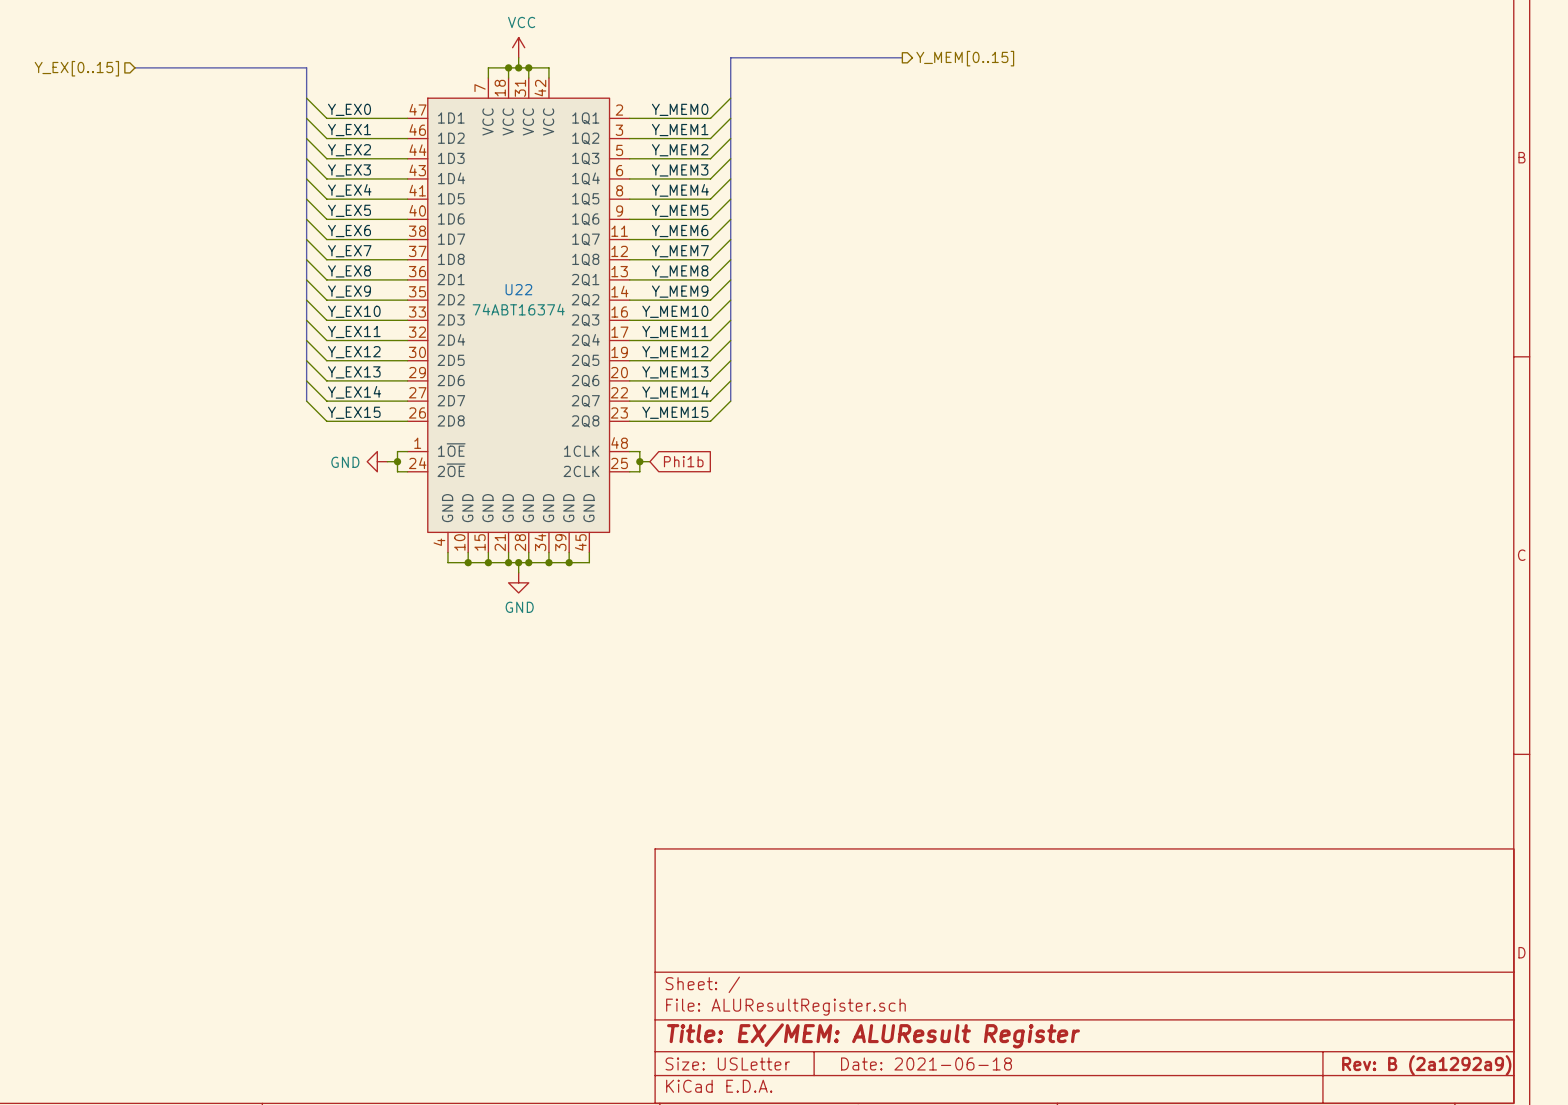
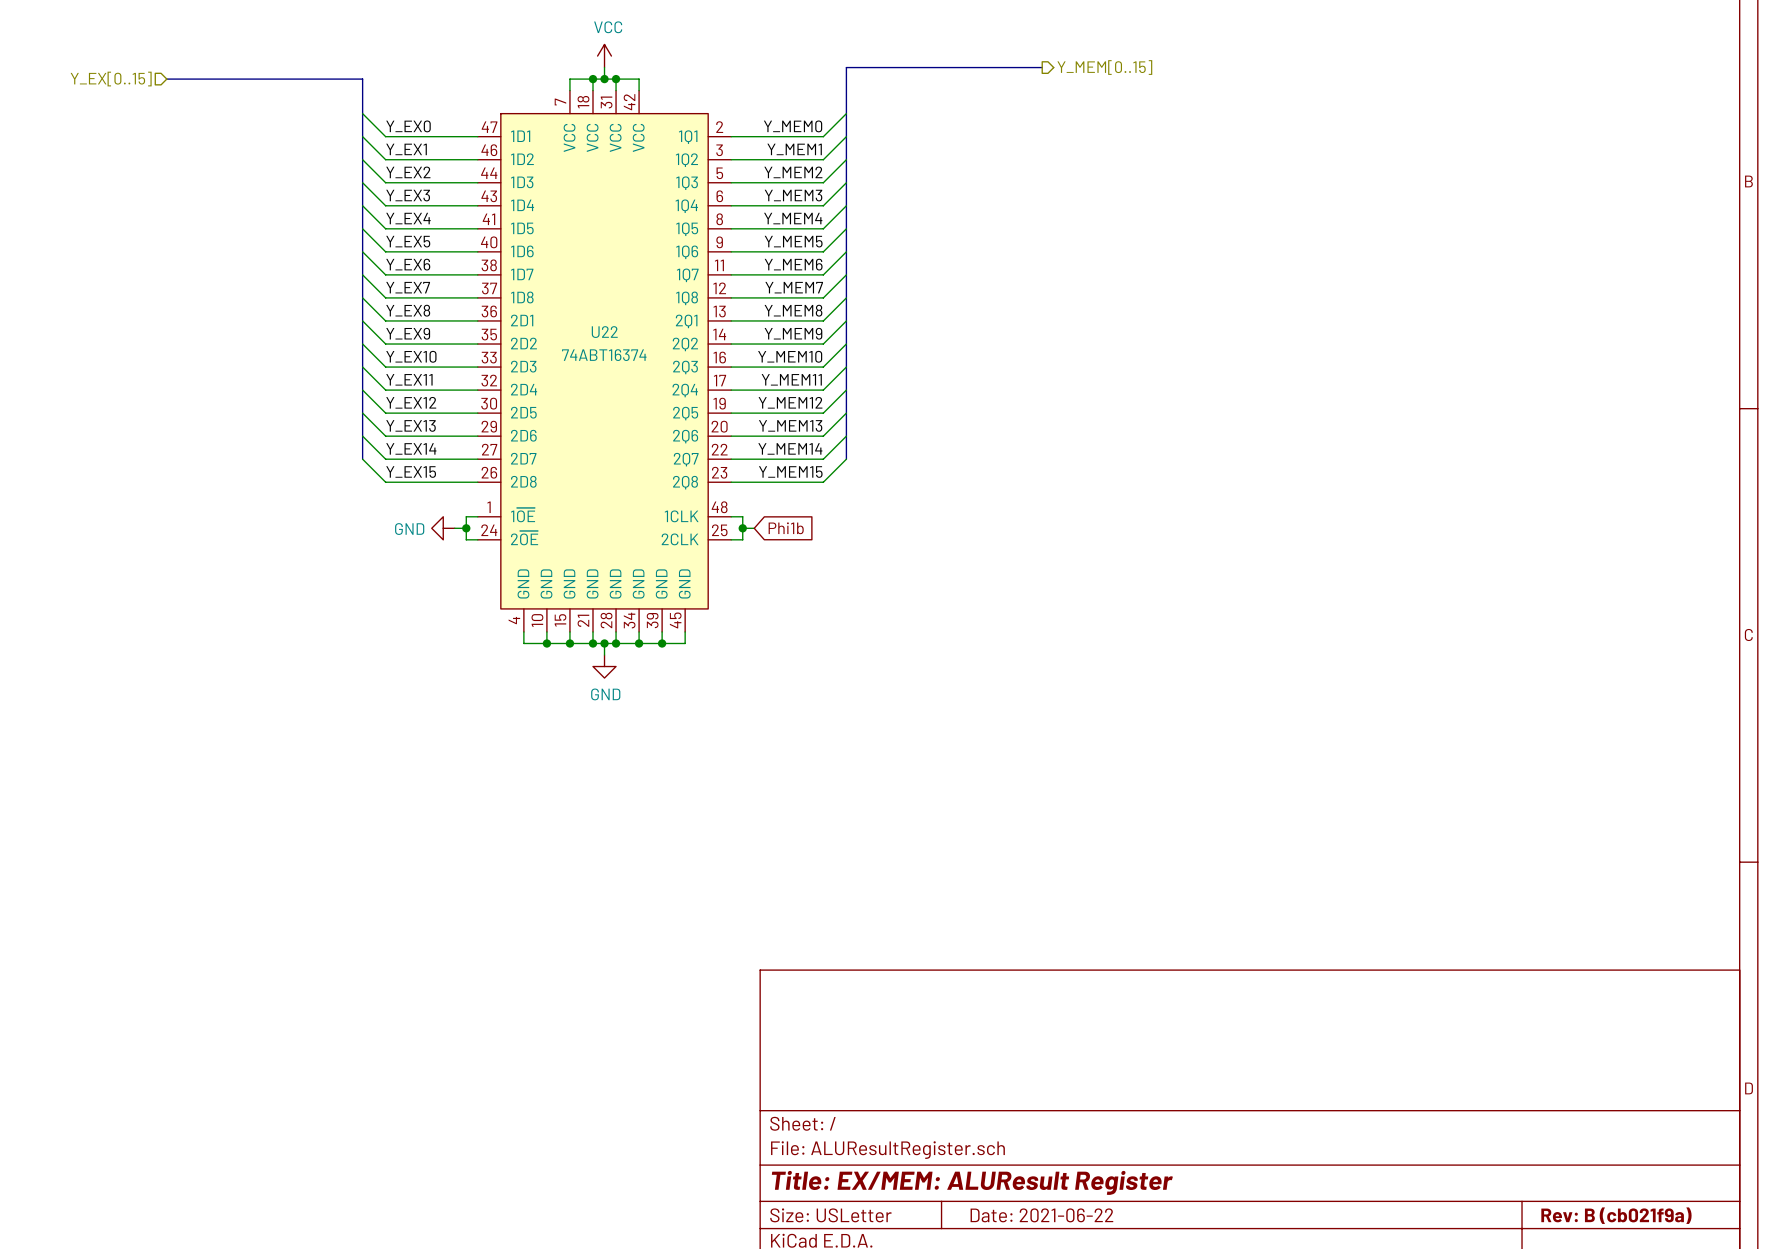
title block: Date: 2021-06-18 (926, 1063) -> Date: 2021-06-22 (1041, 1215)
title block: Rev: B (2a1292a9) (1426, 1065) -> Rev: B (cb021f9a) (1616, 1215)

